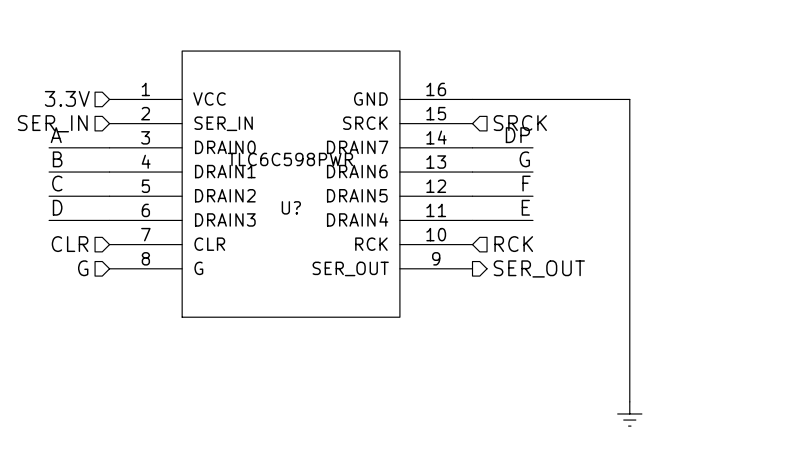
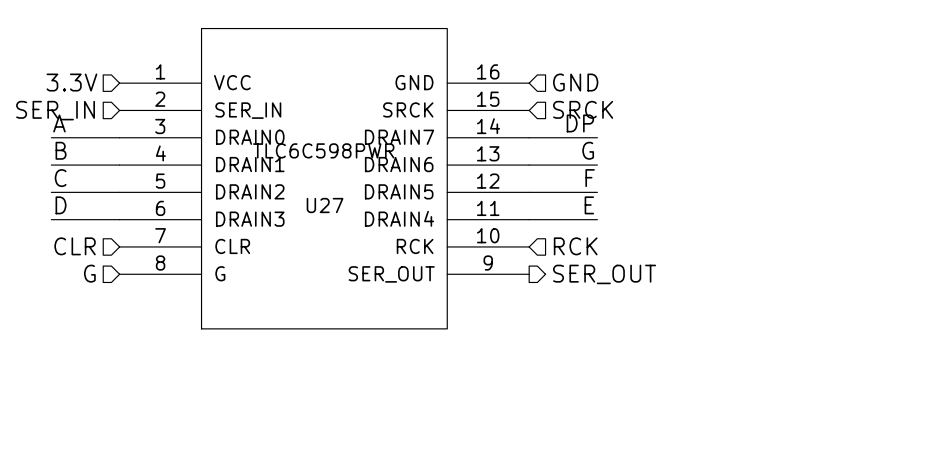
hierarchical label: none -> GND (575, 82)
wire: (472, 99) (629, 99) (629, 401) -> none
U? name: U? (291, 207) -> U27 (325, 205)
power symbol: (629, 413) -> none

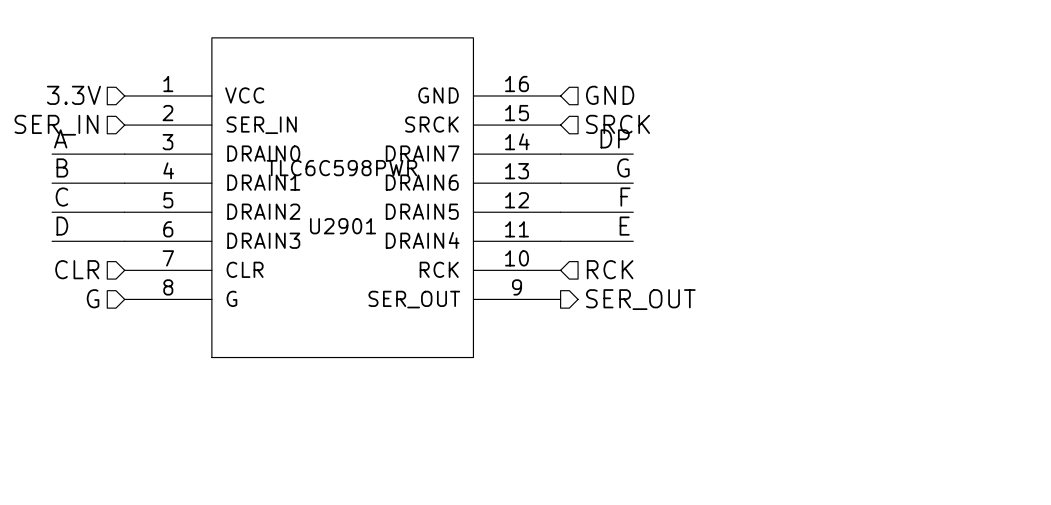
U27 name: U27 (325, 205) -> U2901 (343, 226)

